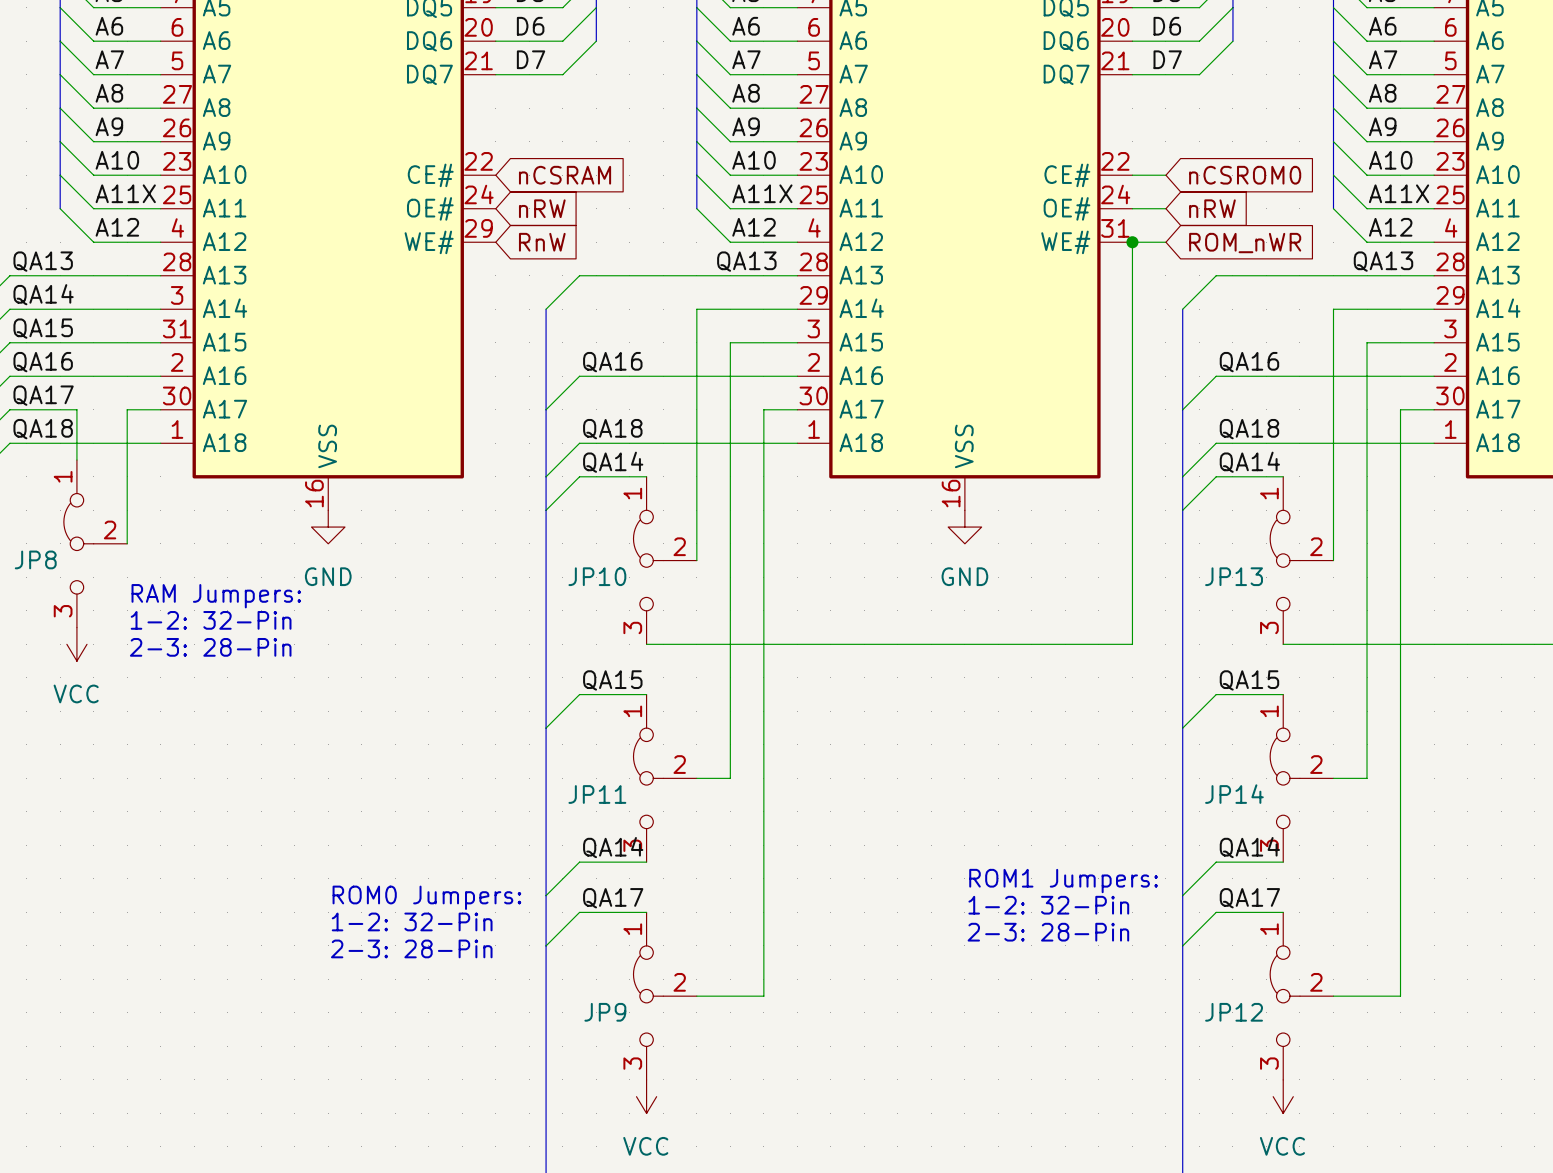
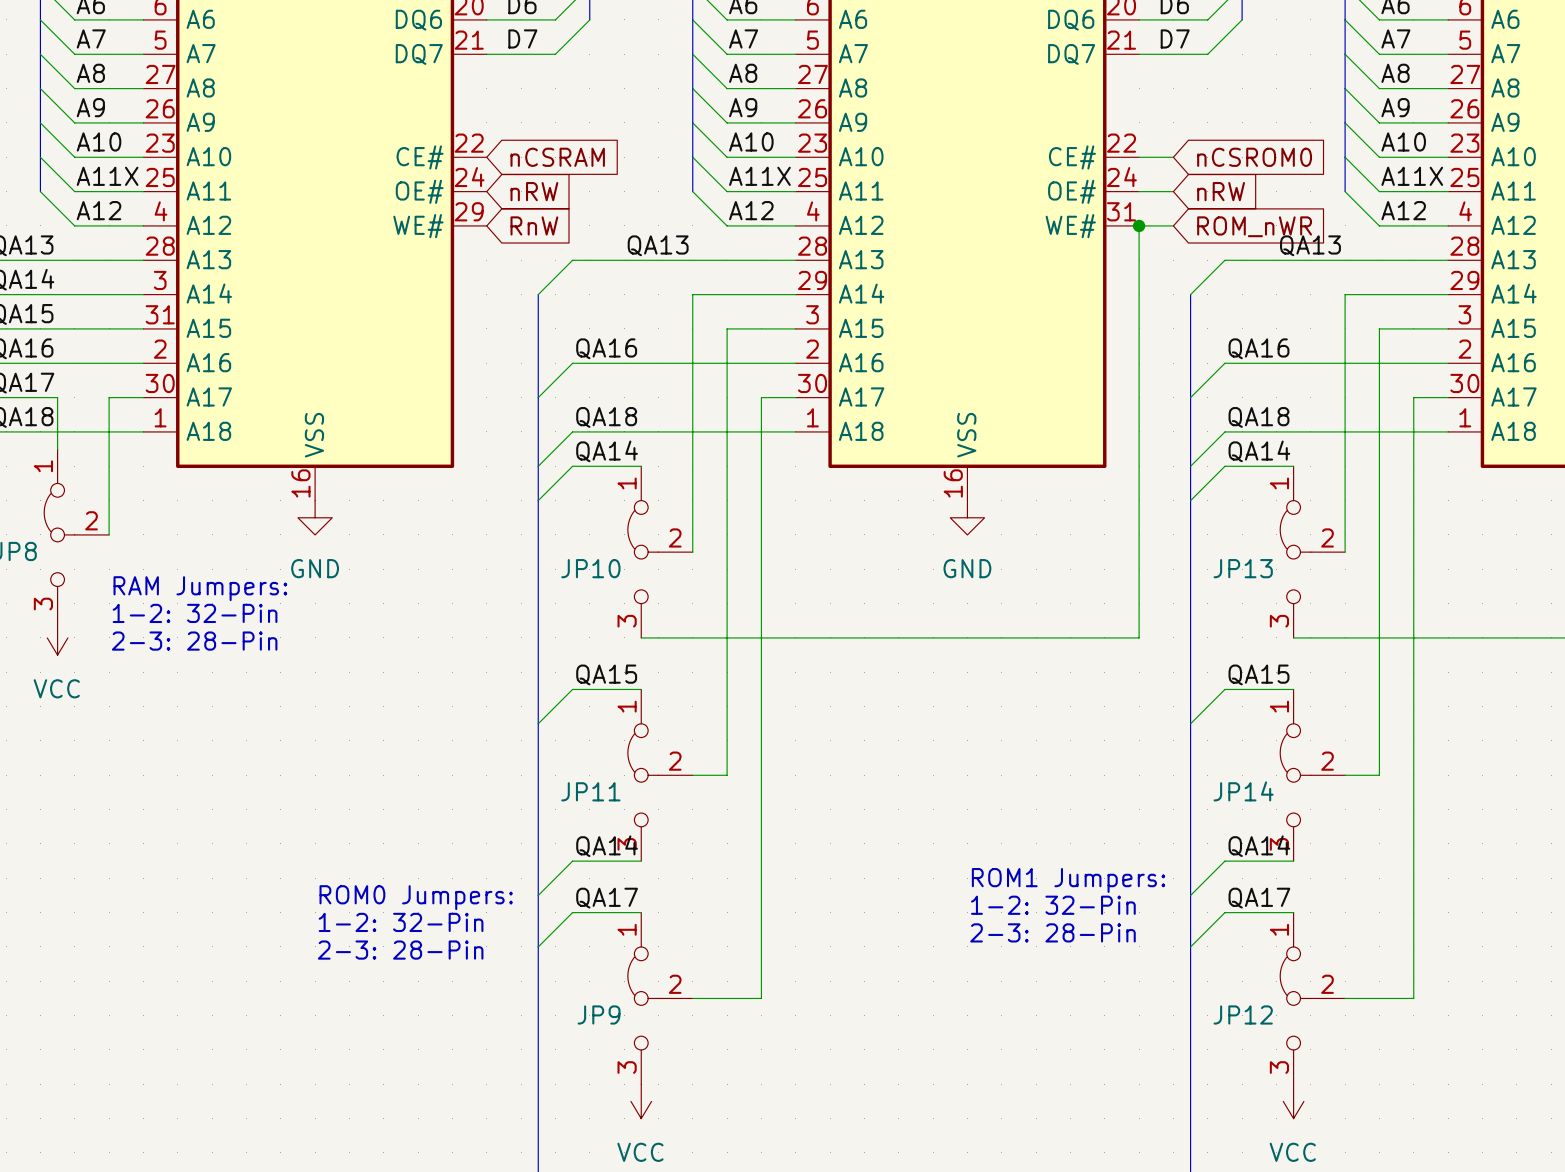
label position: QA13 (746, 261) -> QA13 (658, 245)
label position: QA13 (1383, 261) -> QA13 (1310, 245)

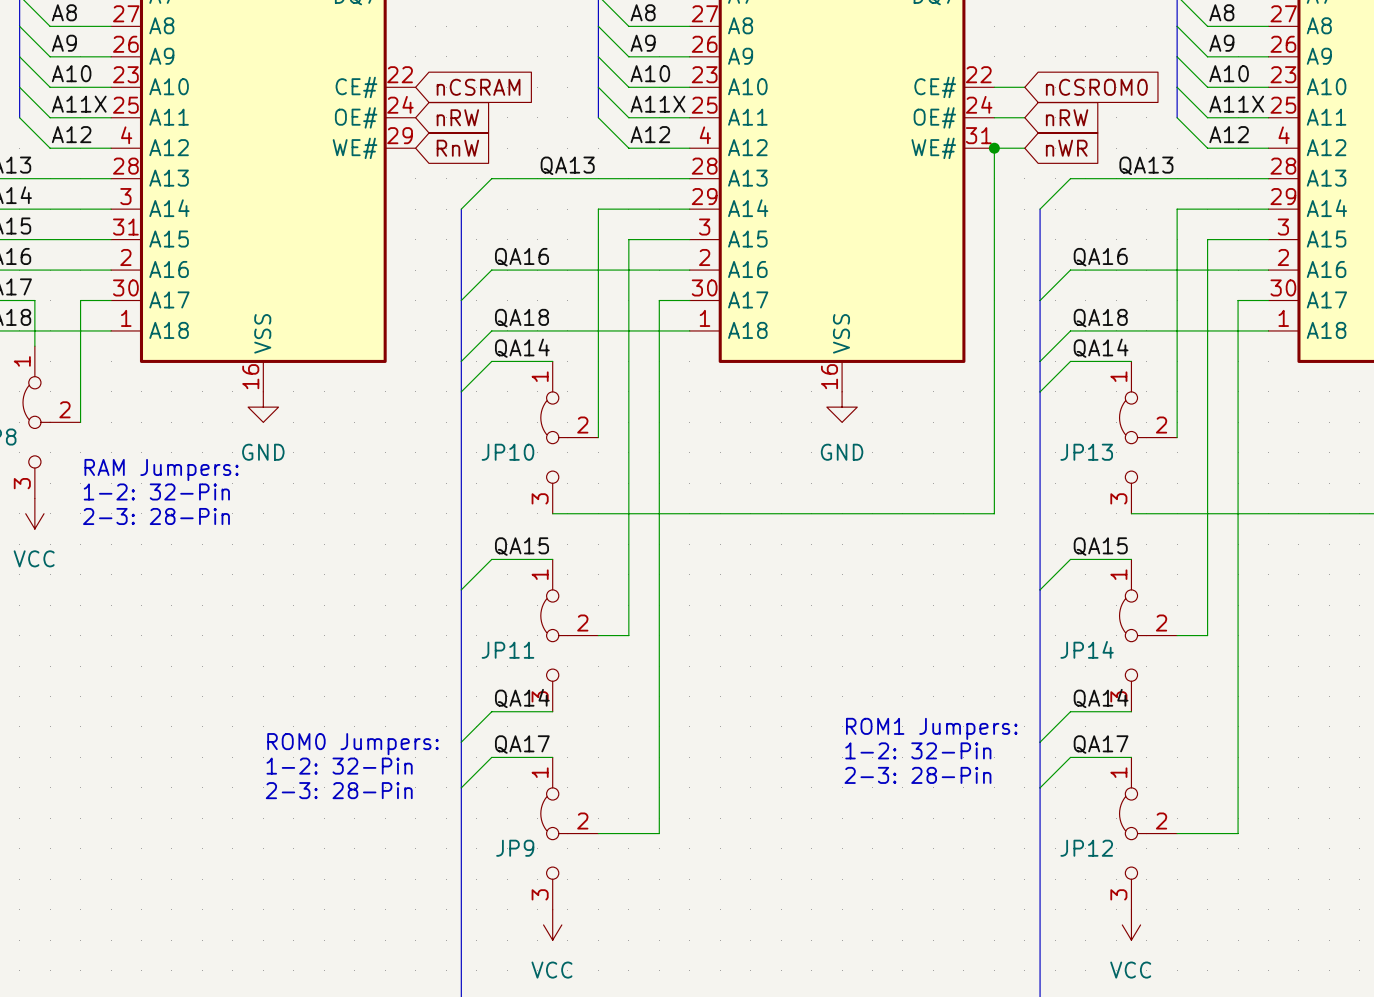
global label: ROM_nWR (1254, 226) -> nWR (1066, 148)

